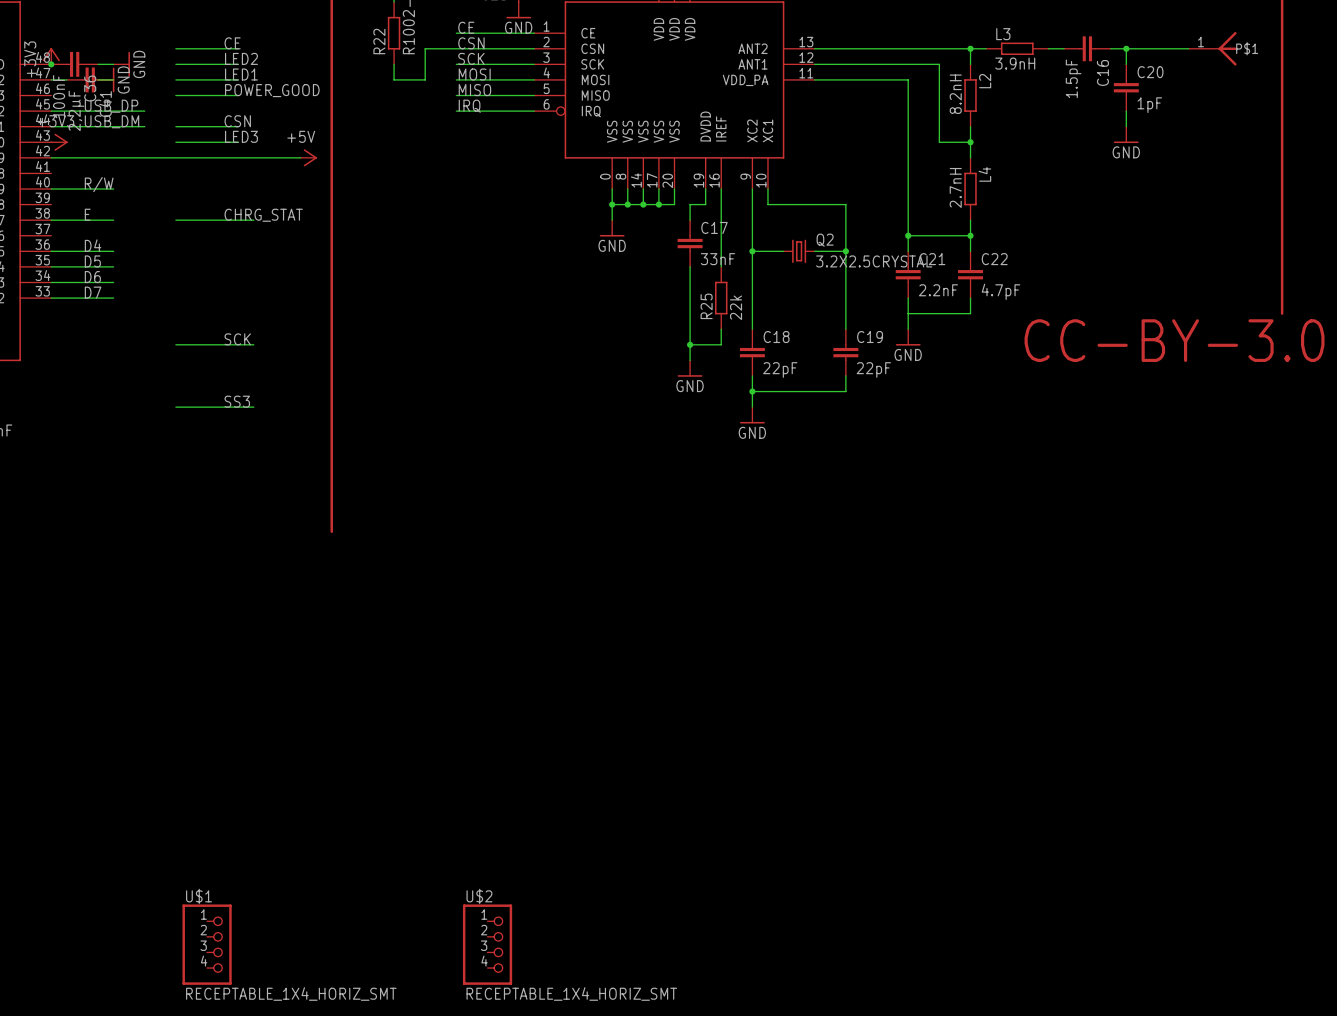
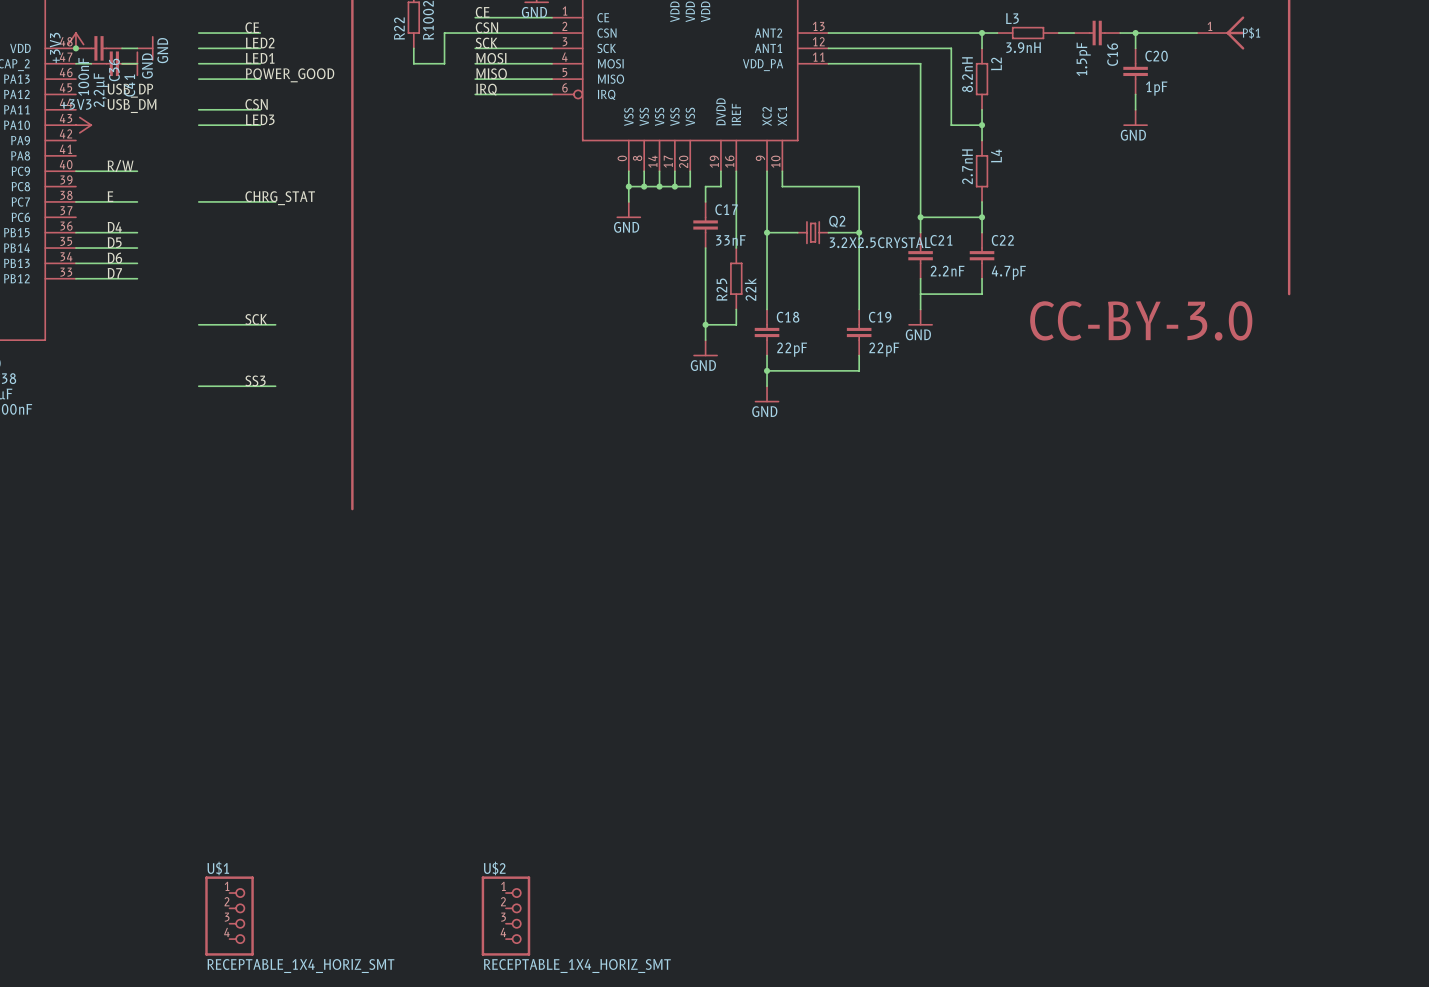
wire: (51, 111) (144, 111) -> none
wire: (51, 126) (144, 126) -> none
wire: (51, 157) (300, 157) -> none
power symbol: +5V (308, 157) -> none

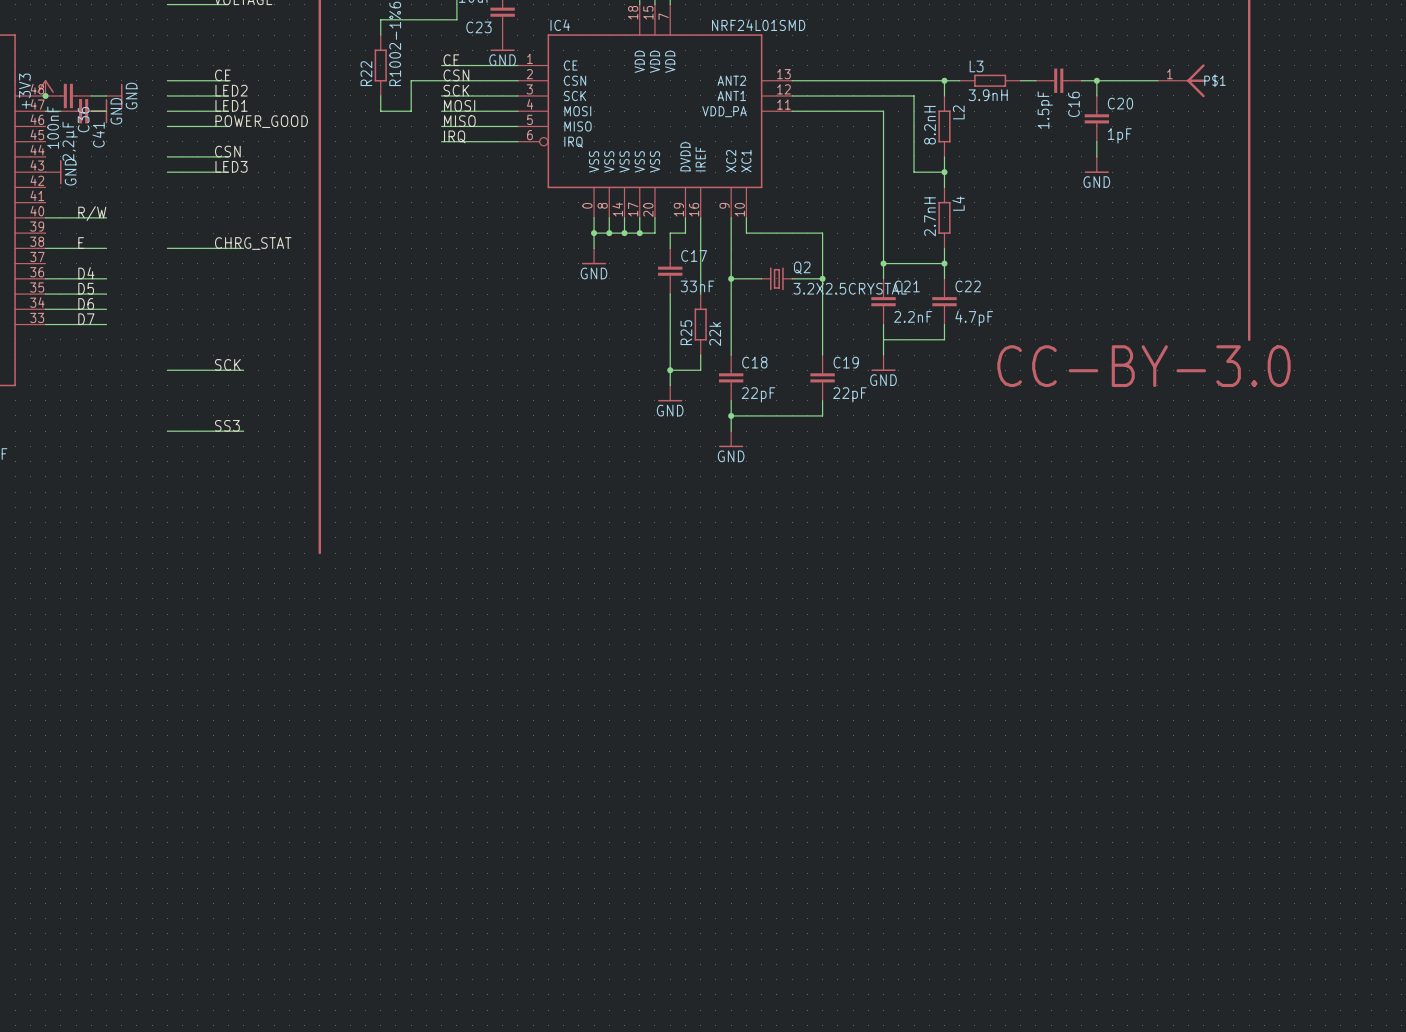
label: USB_DP (130, 90) -> none
label: USB_DM (132, 106) -> none
power symbol: +3V3 (84, 125) -> GND (53, 172)
U$1: RECEPTABLE_1X4_HORIZ_SMT (229, 916) -> none
U$2: RECEPTABLE_1X4_HORIZ_SMT (505, 916) -> none

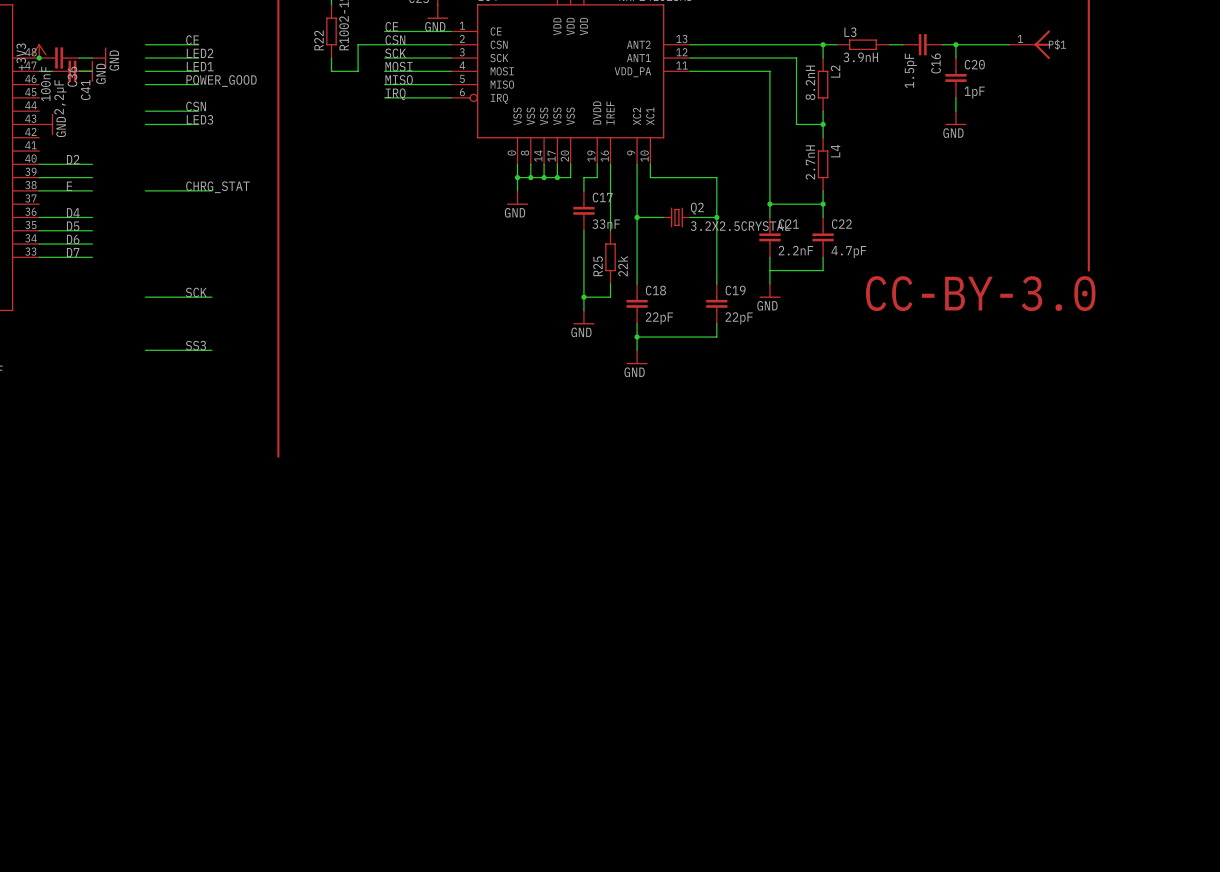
label: R/W (92, 213) -> D2 (73, 159)
wire: none -> (39, 177) (92, 177)

